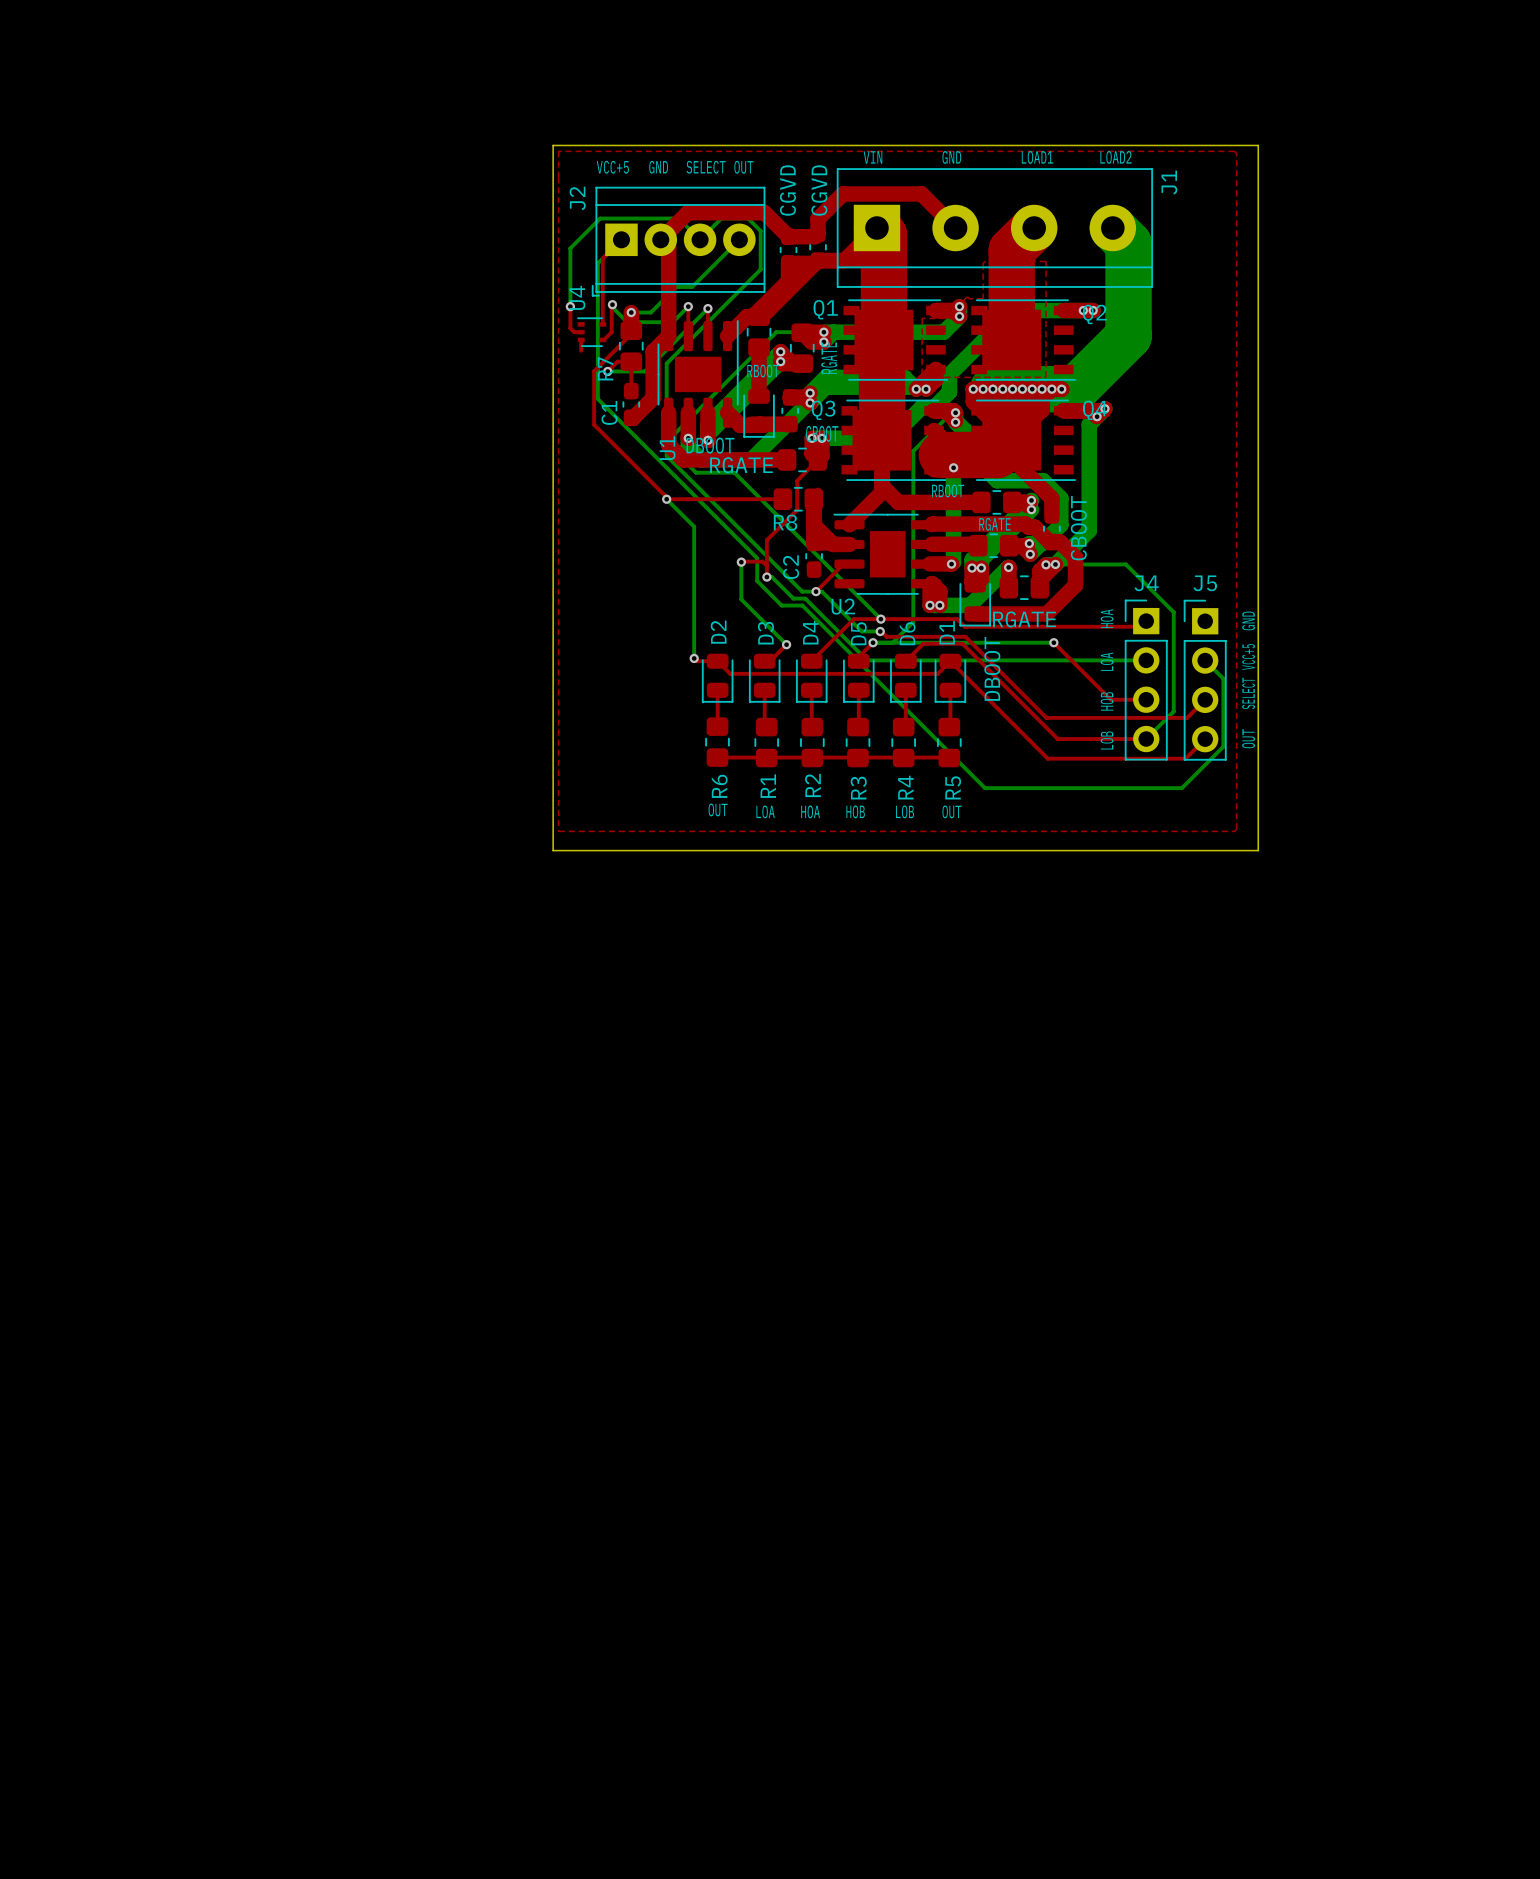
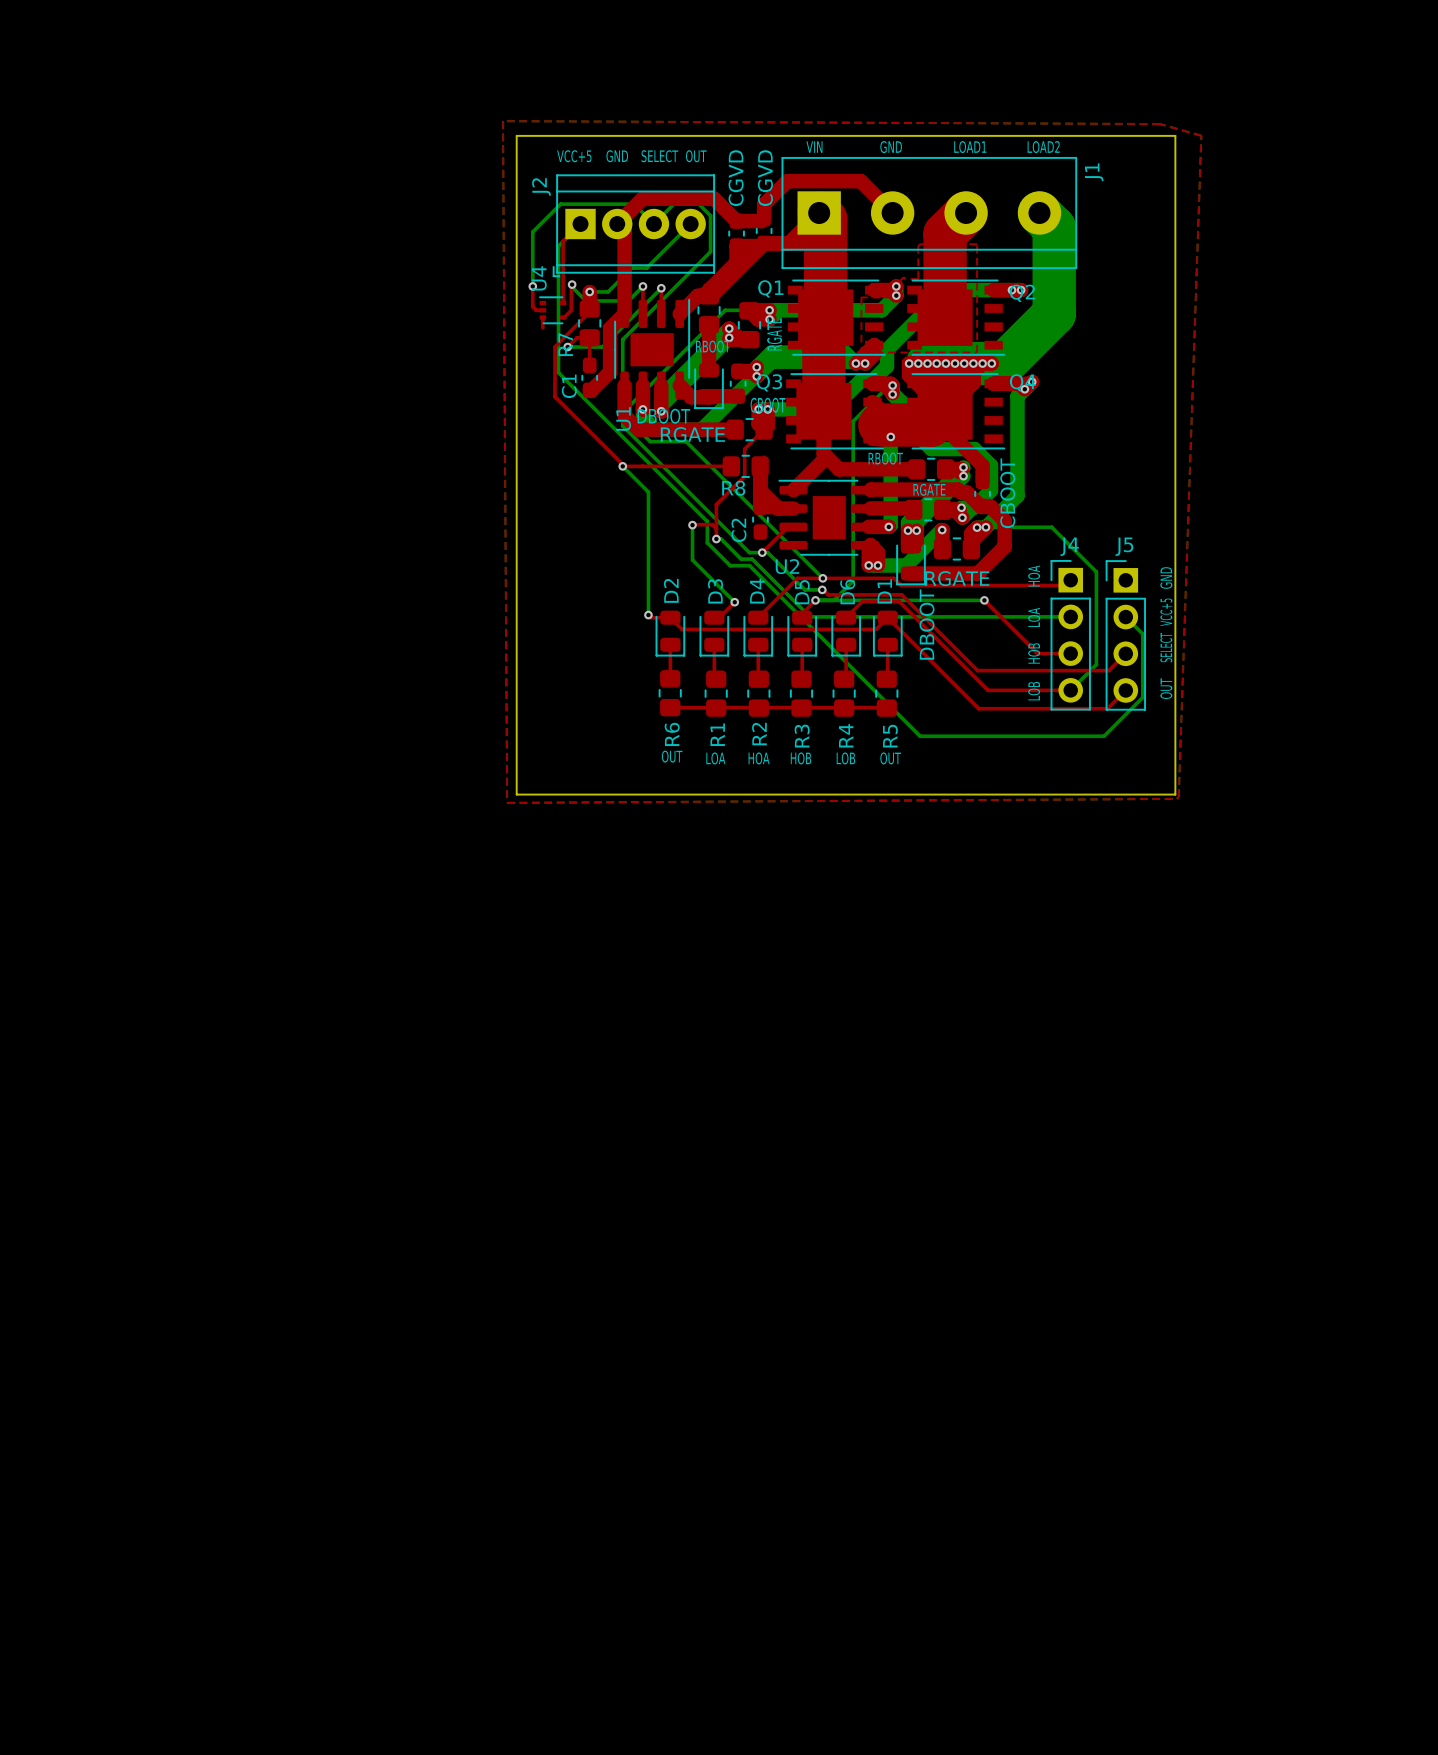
top zone outline: (558, 151) (1234, 151) (1236, 153) (1236, 829) (1234, 831) (558, 831) (558, 151) -> (503, 121) (507, 802) (1176, 798) (1178, 797) (1201, 135) (1159, 124) (503, 121)

